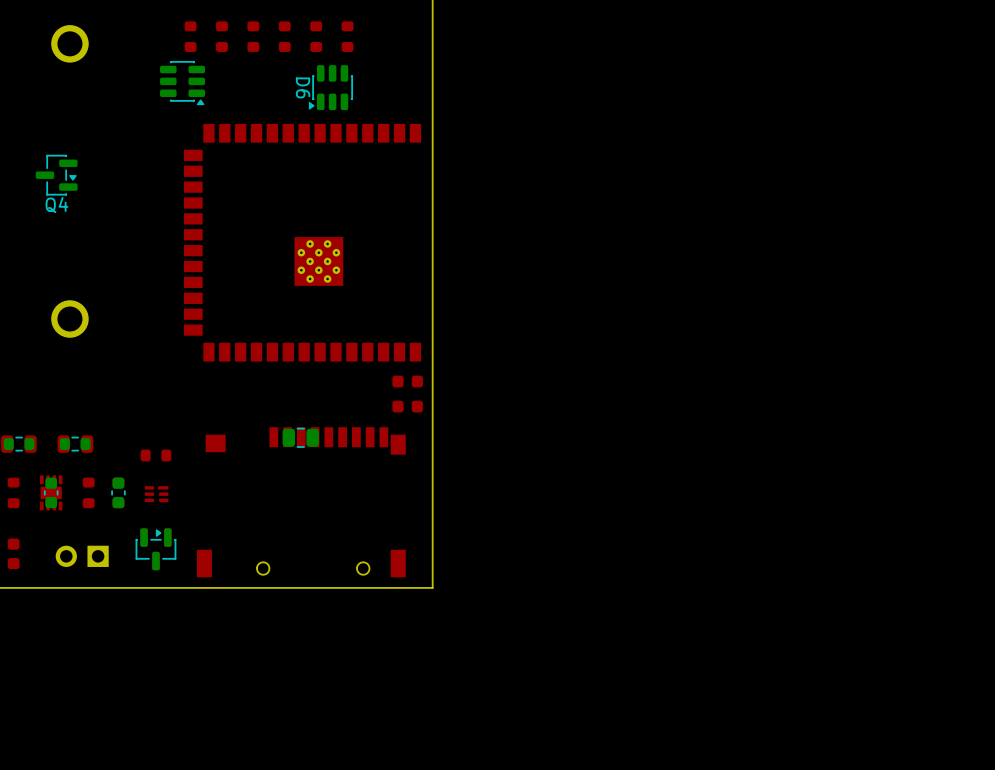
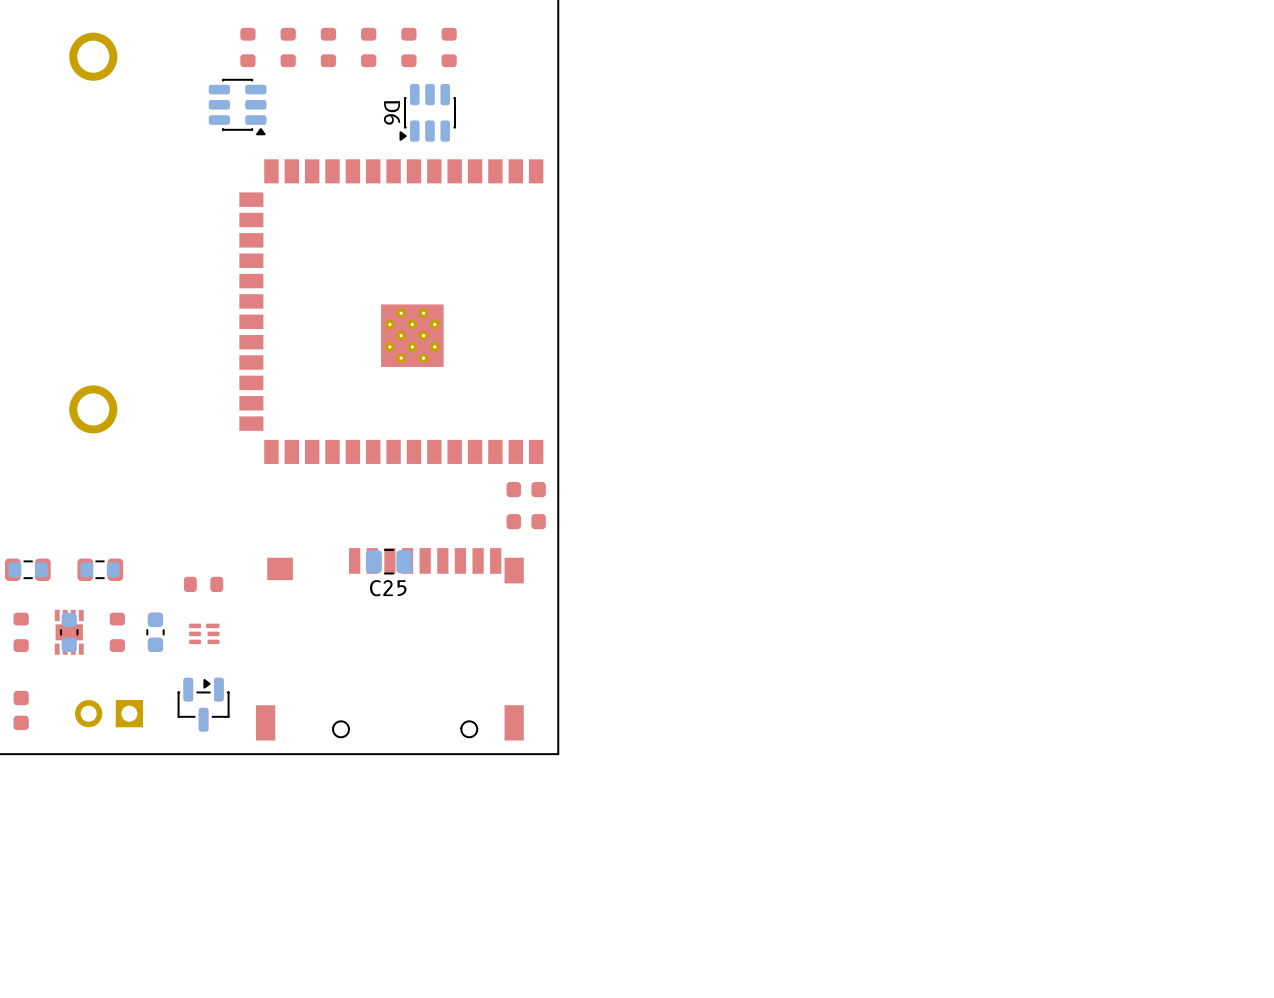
Q4: (56, 175) -> none
C25 name: none -> C25 (388, 588)

